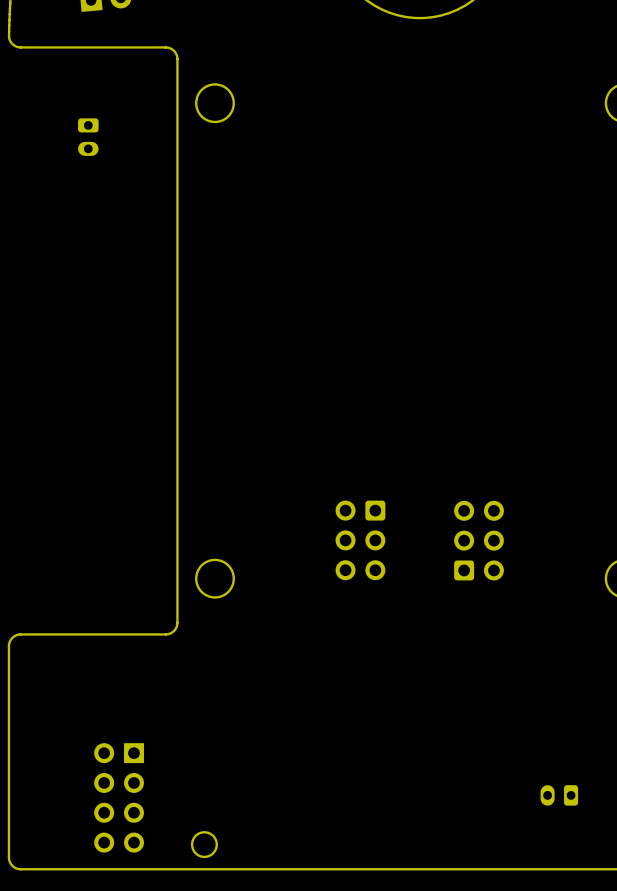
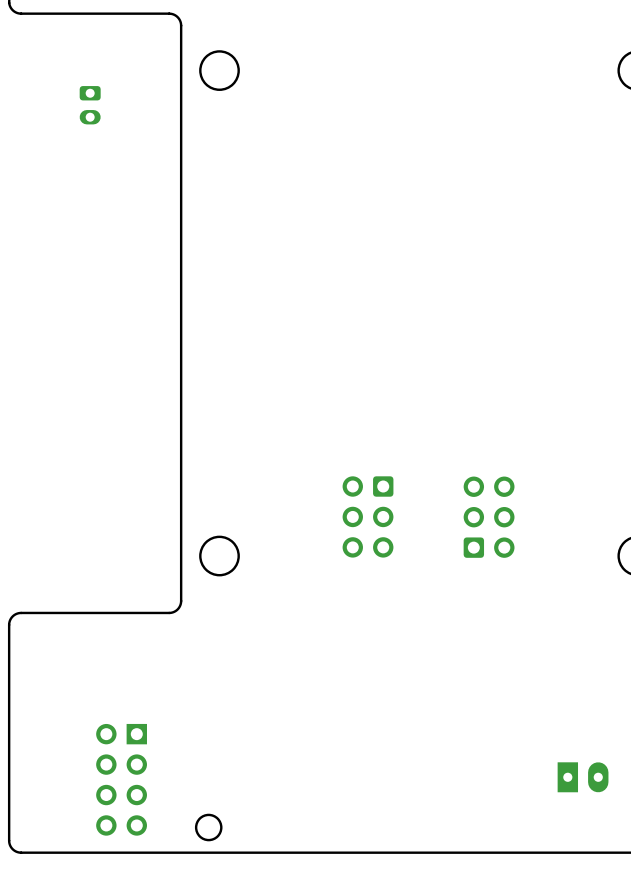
part: (559, 795) -> none
part: none -> (583, 777)

